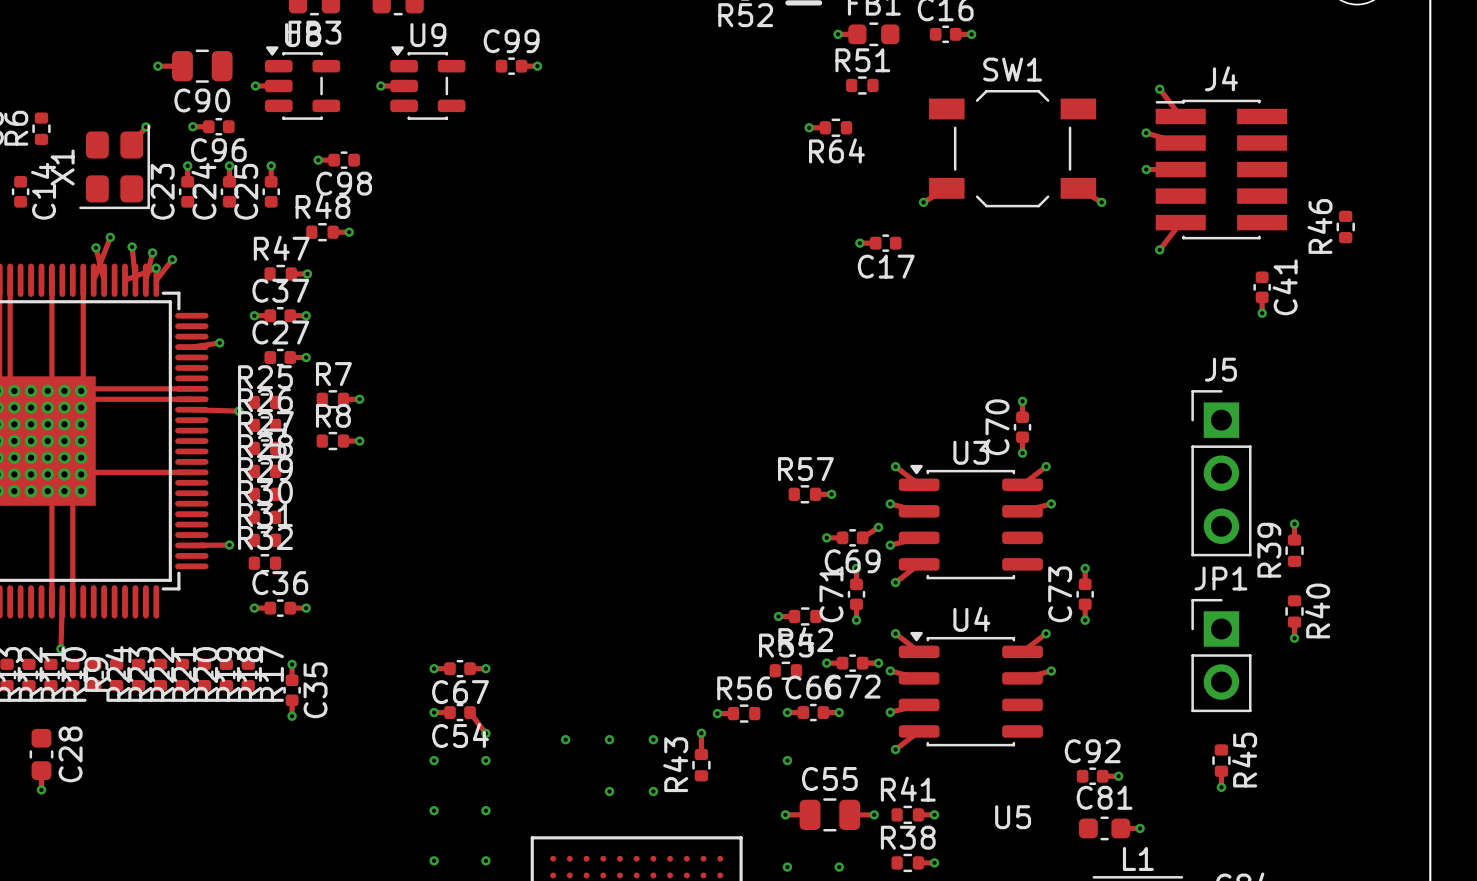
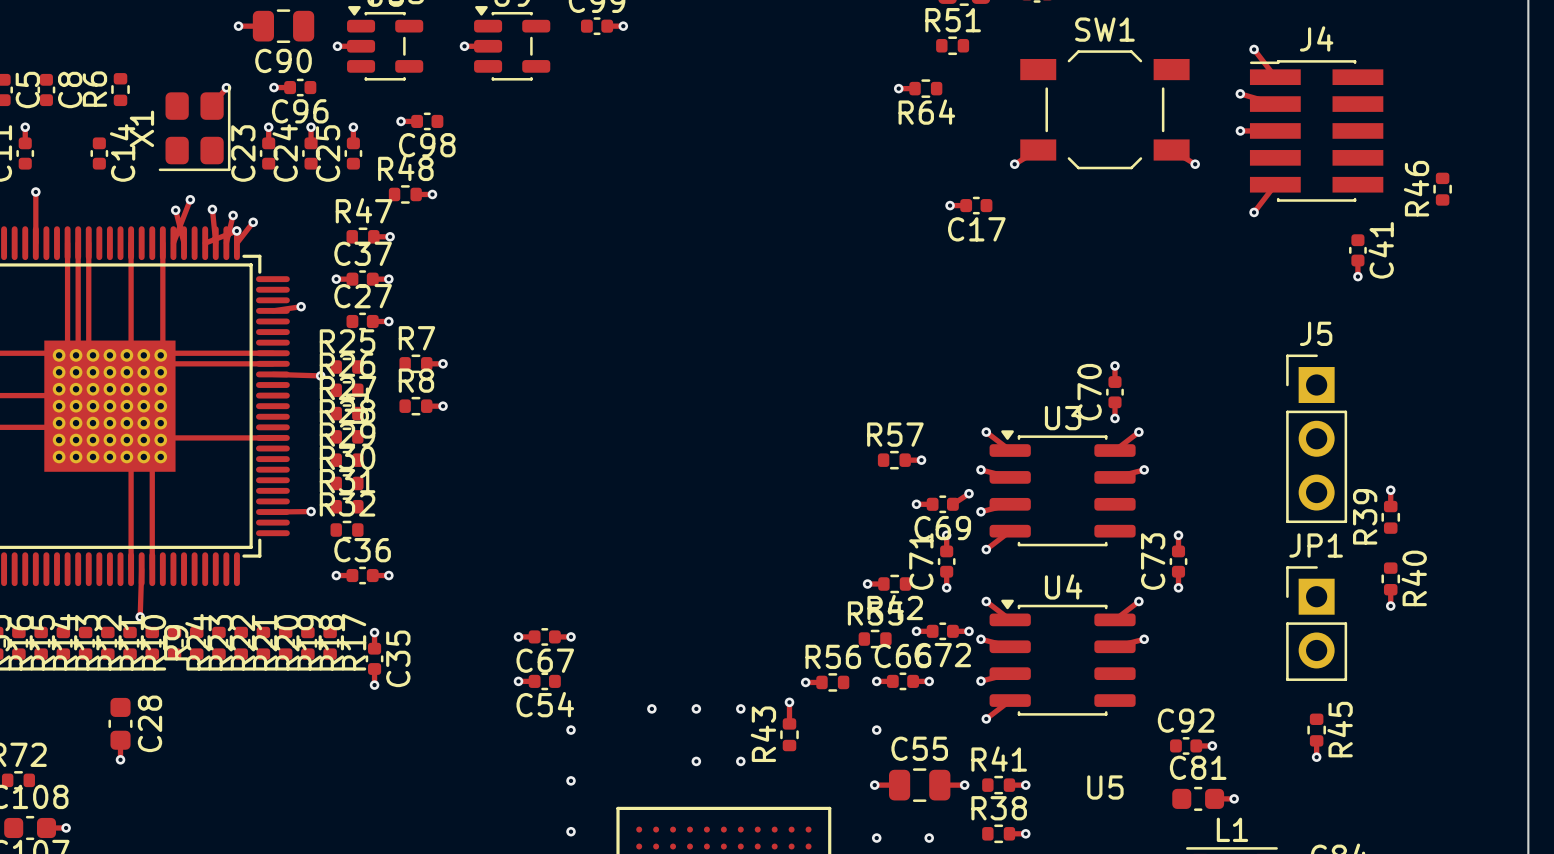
track: (470, 712) (485, 733) -> none
via: (485, 733) -> none
via: (434, 760) -> none
via: (434, 810) -> none
via: (434, 860) -> none

